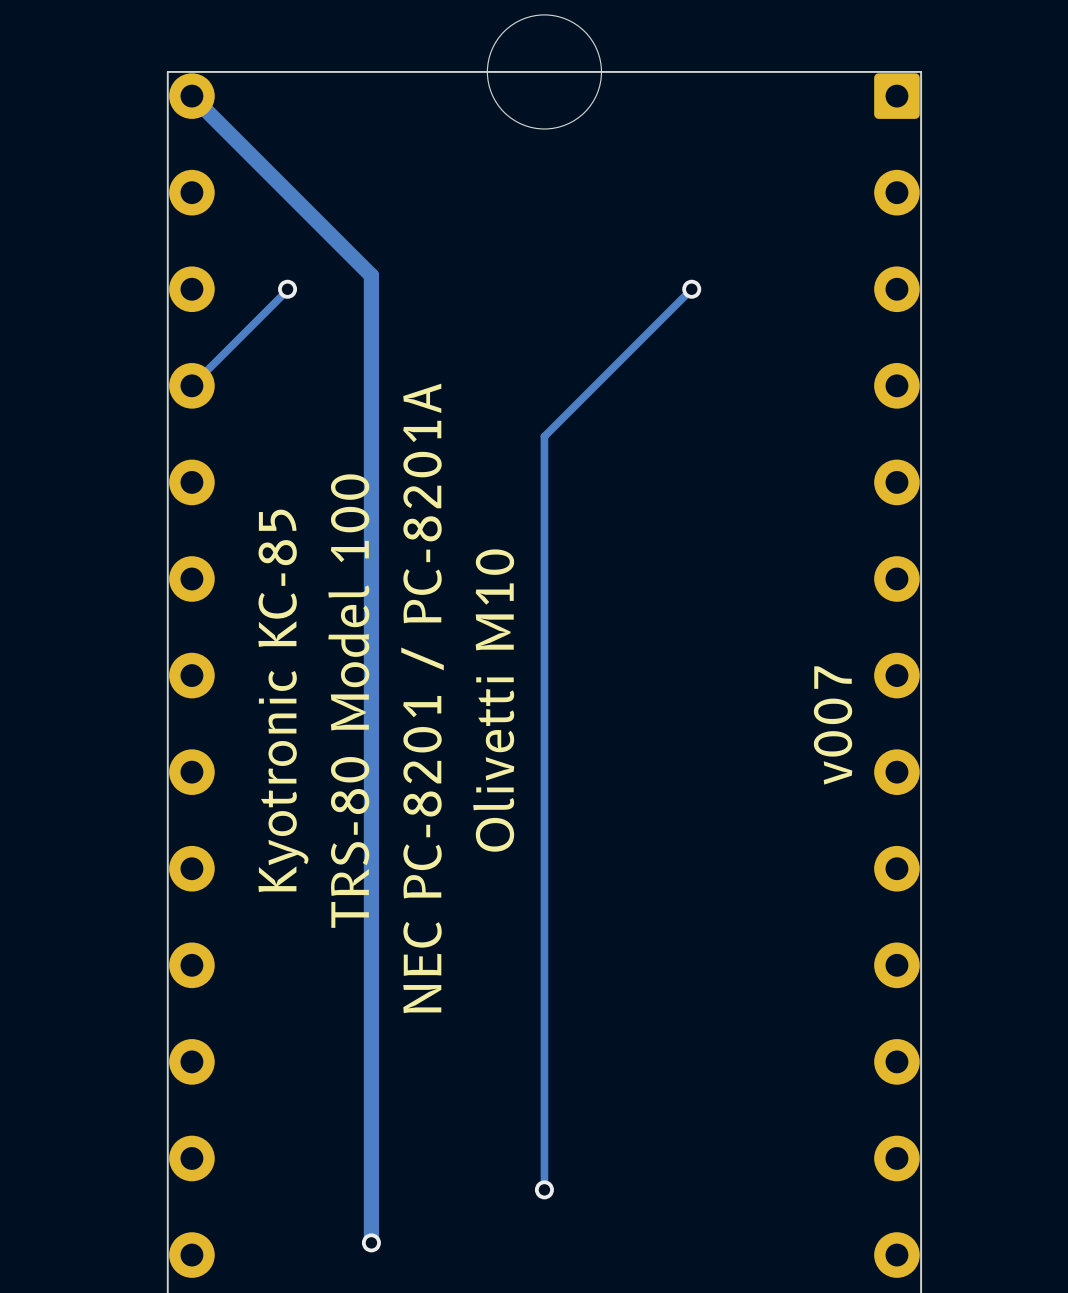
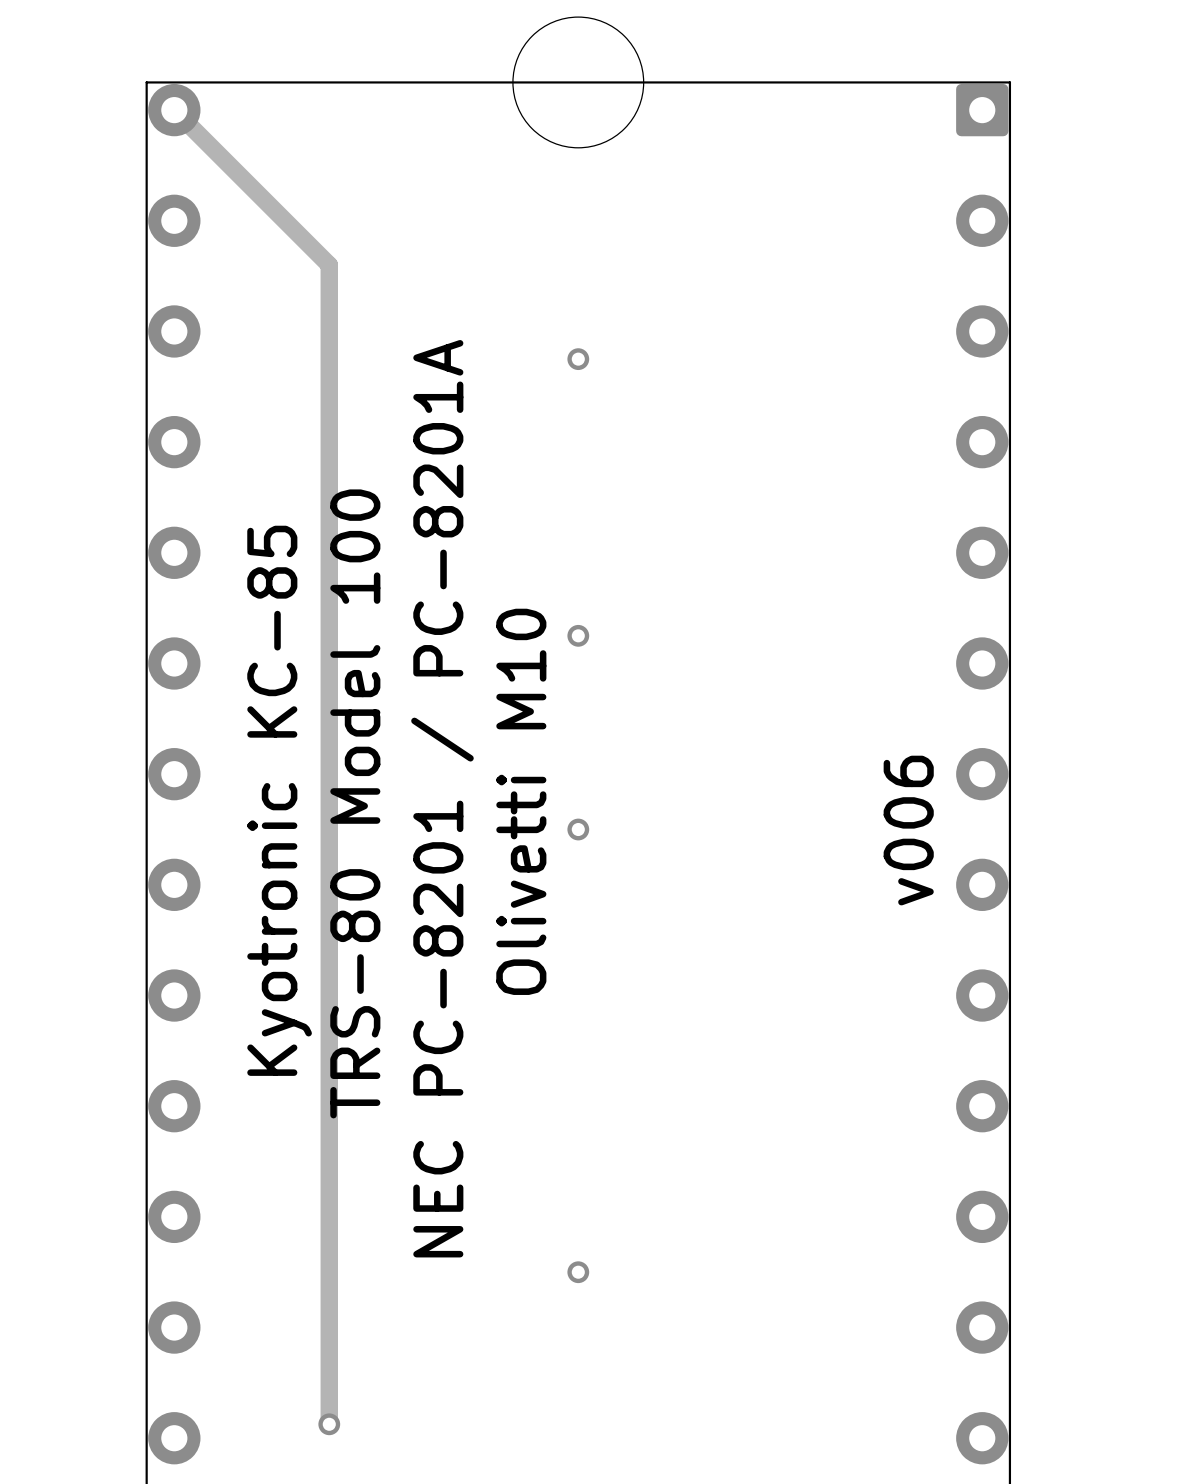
track: (327, 231) (371, 275) (371, 1242) -> (329, 265) (329, 1424)
track: (287, 289) (191, 385) -> none
via: (287, 289) -> none
track: (691, 289) (544, 436) (544, 1189) -> none
via: (691, 289) -> none
via: none -> (578, 359)
via: none -> (578, 635)
via: none -> (578, 829)
text: v007 (833, 725) -> v006 (908, 830)
via: none -> (578, 1272)
via: (544, 1189) -> none
via position: (371, 1242) -> (329, 1424)

